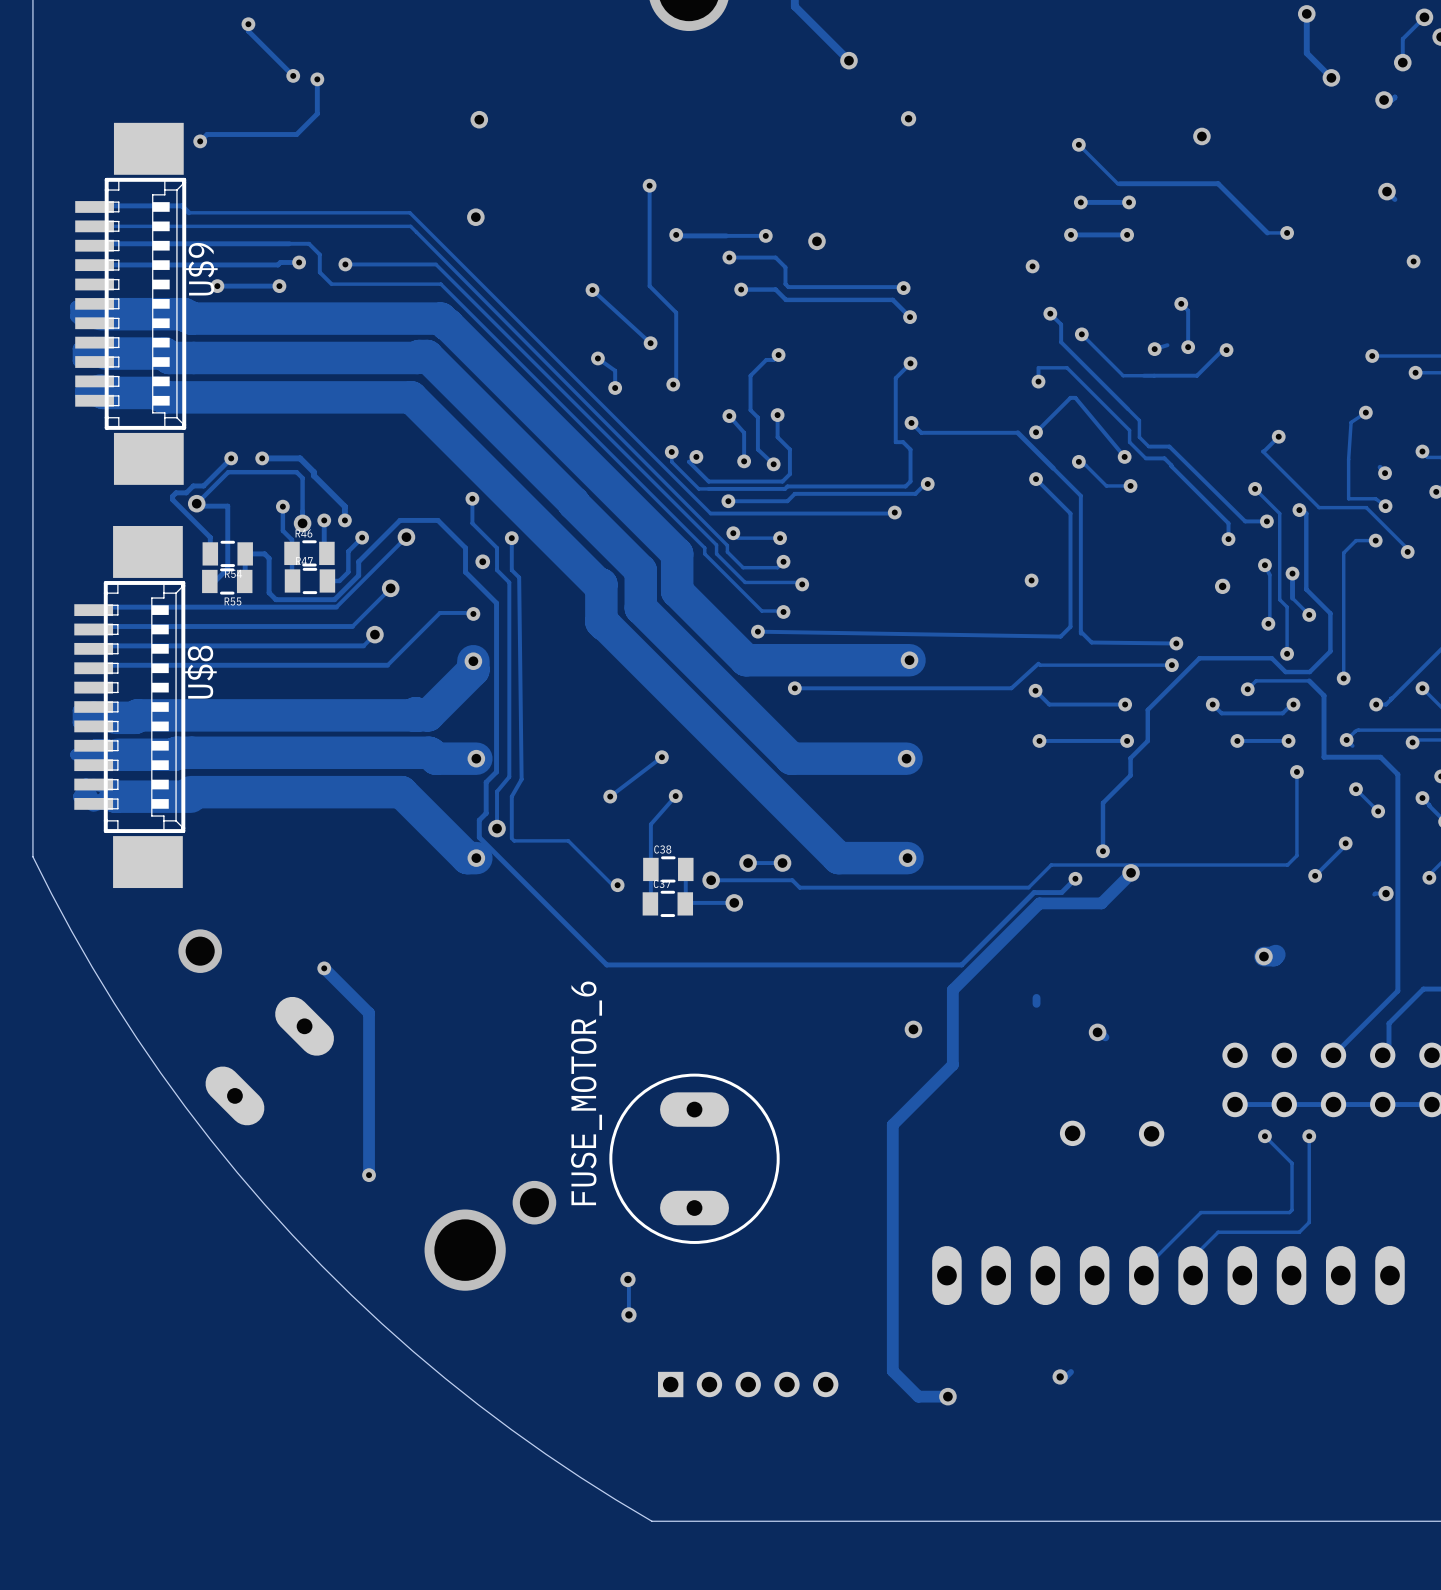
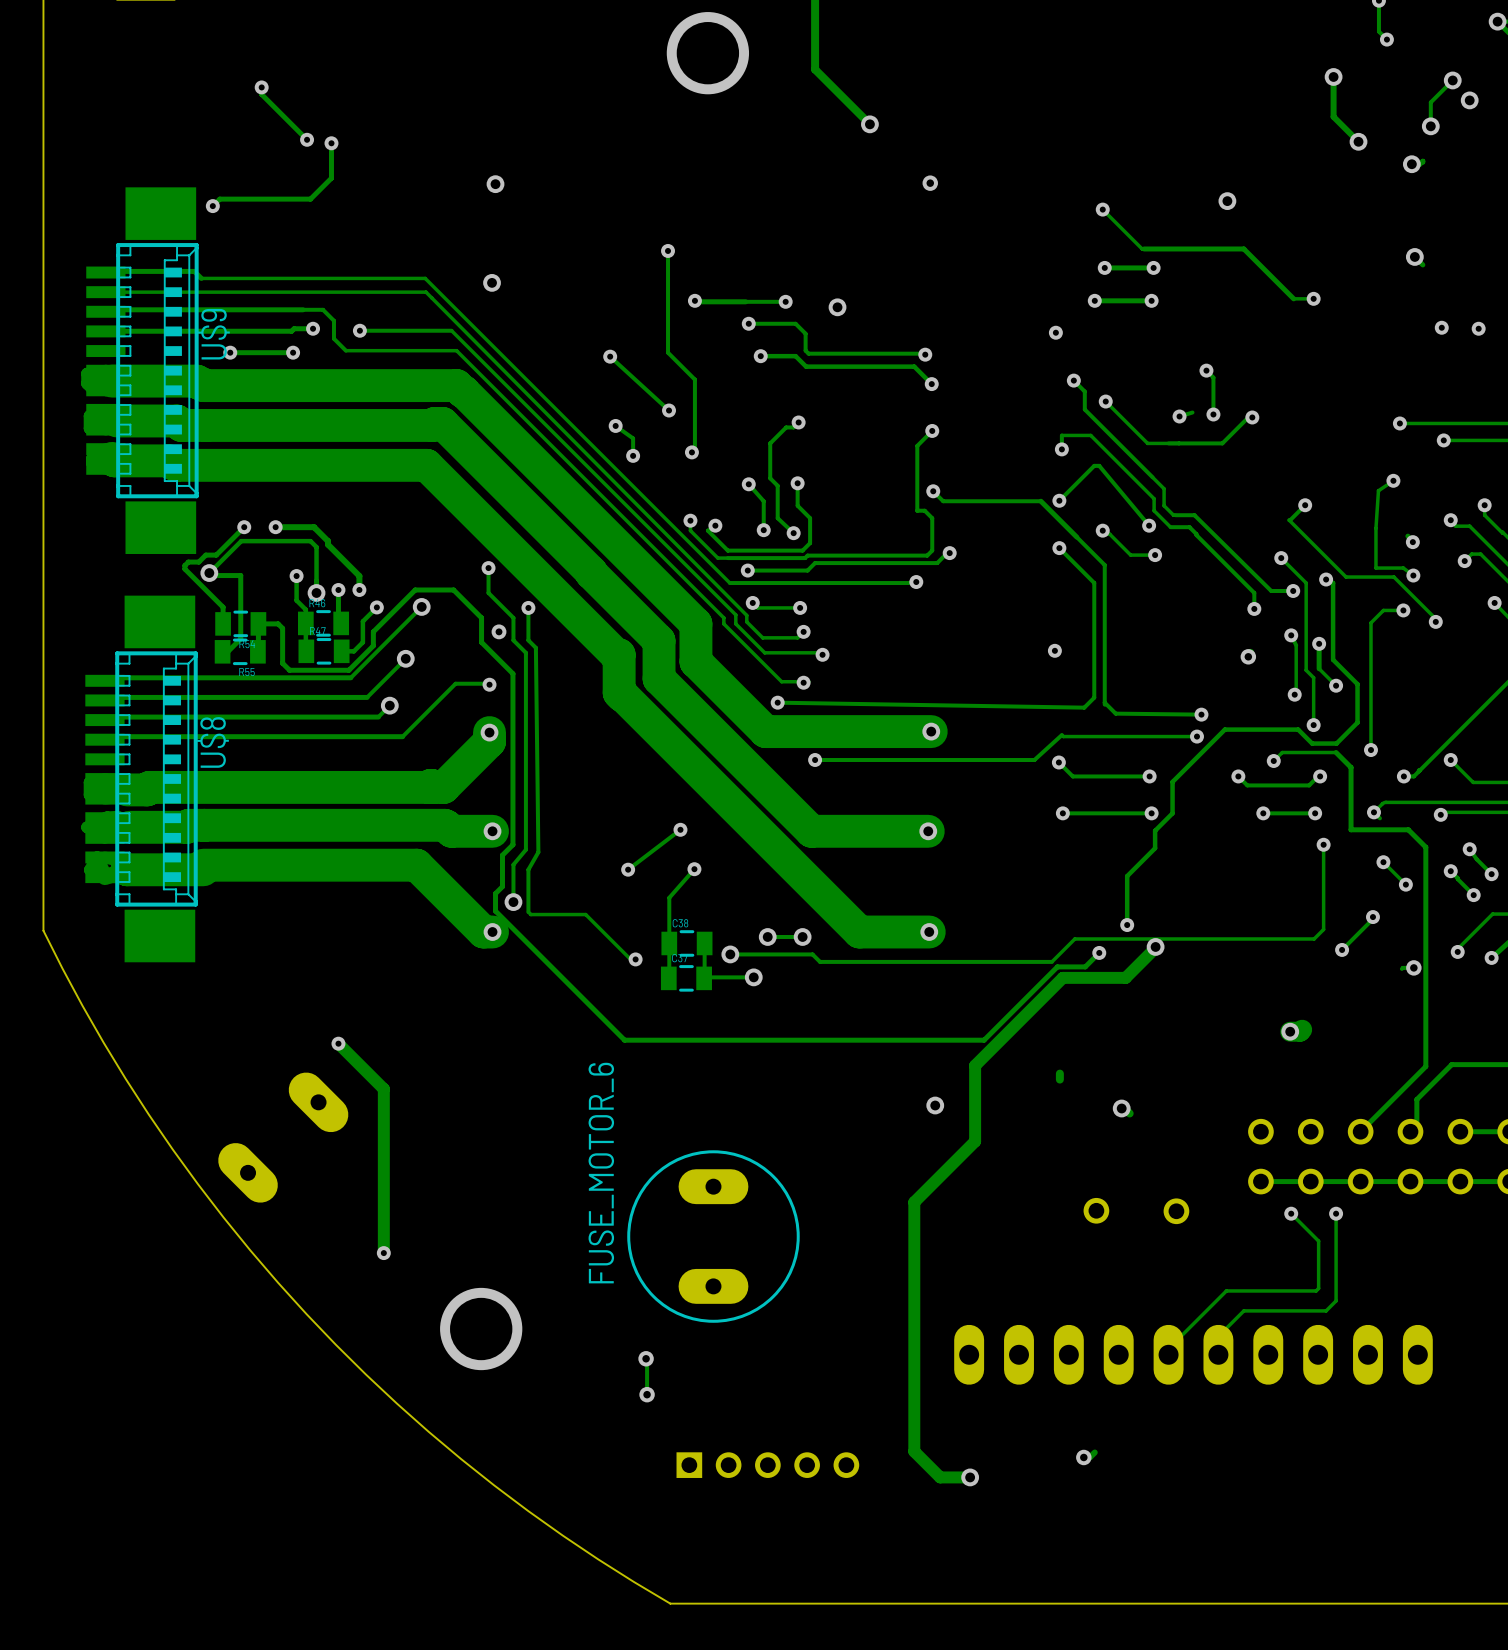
via: (200, 951) -> none
via: (534, 1202) -> none

